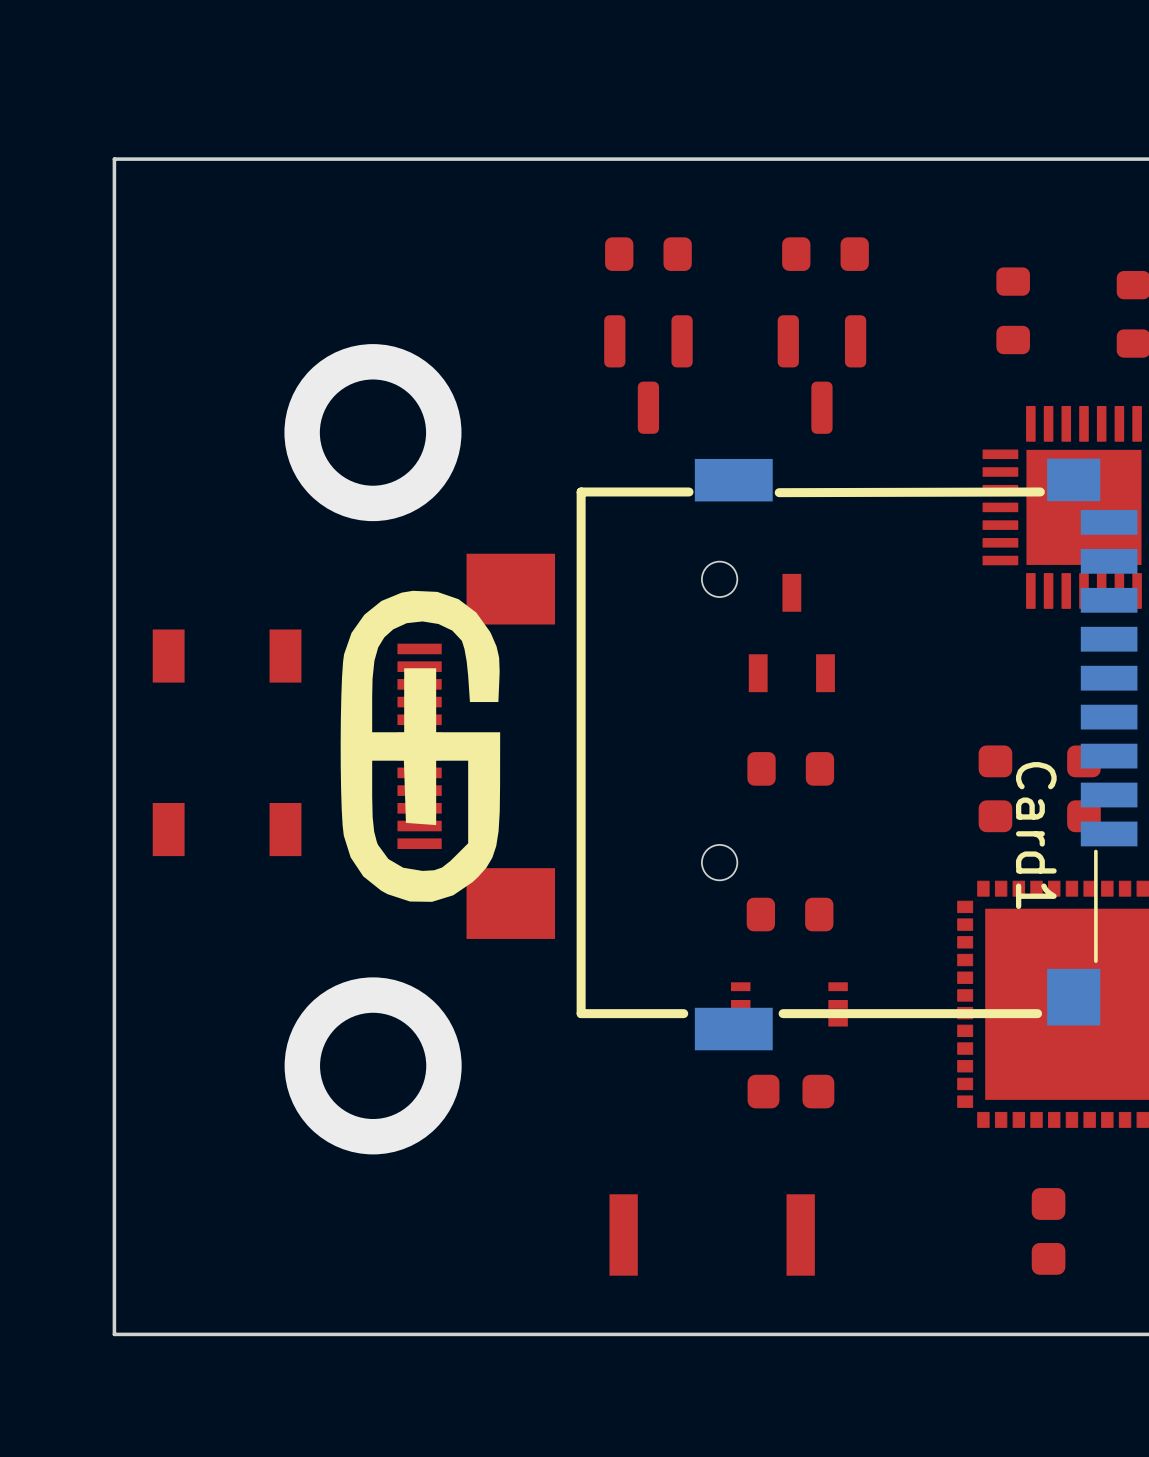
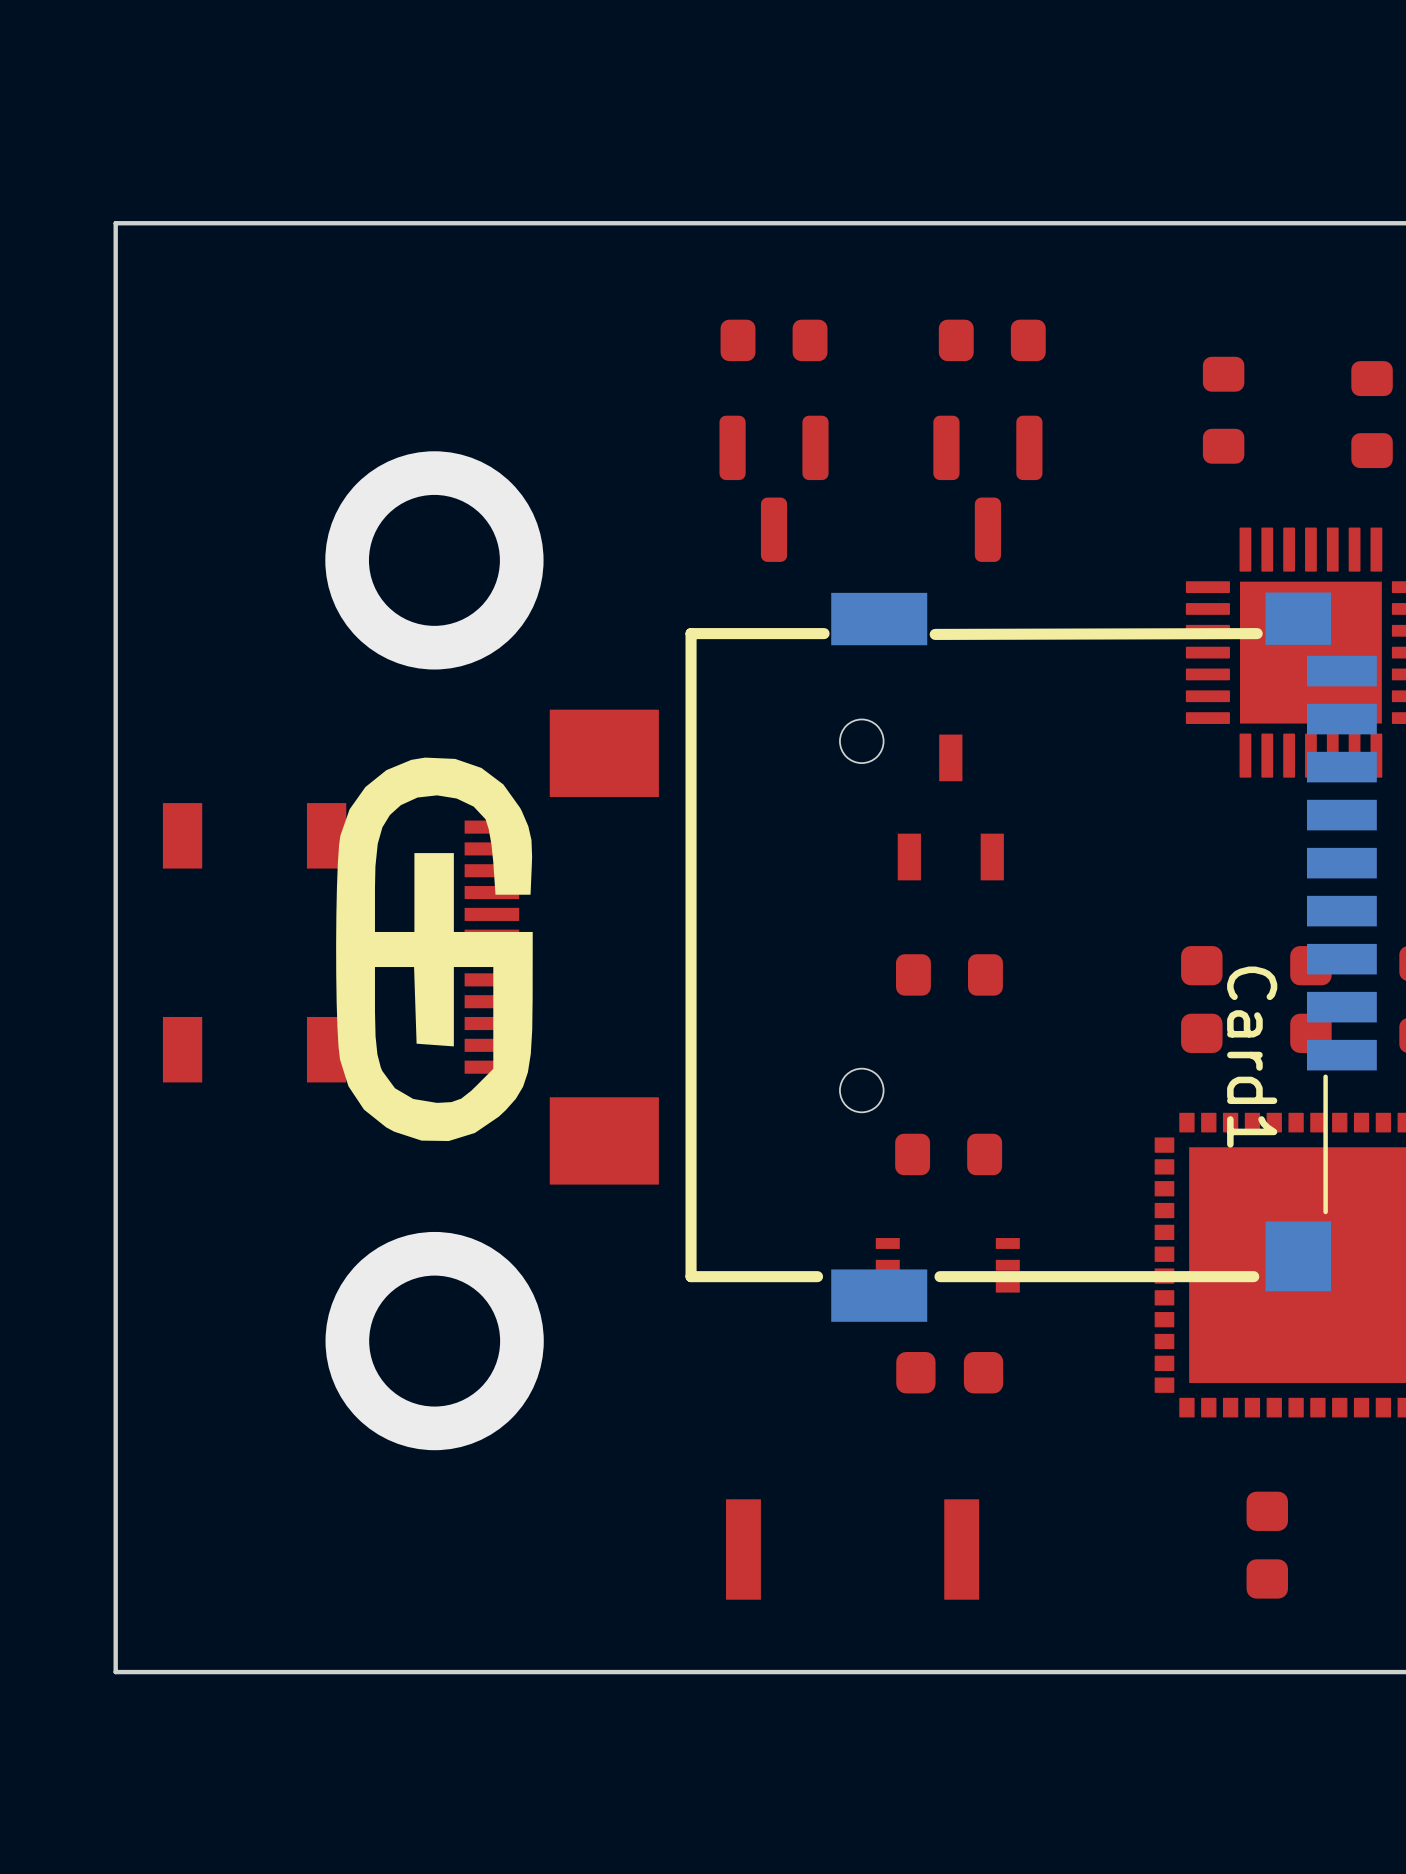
drawing position: (420, 746) -> (434, 949)

